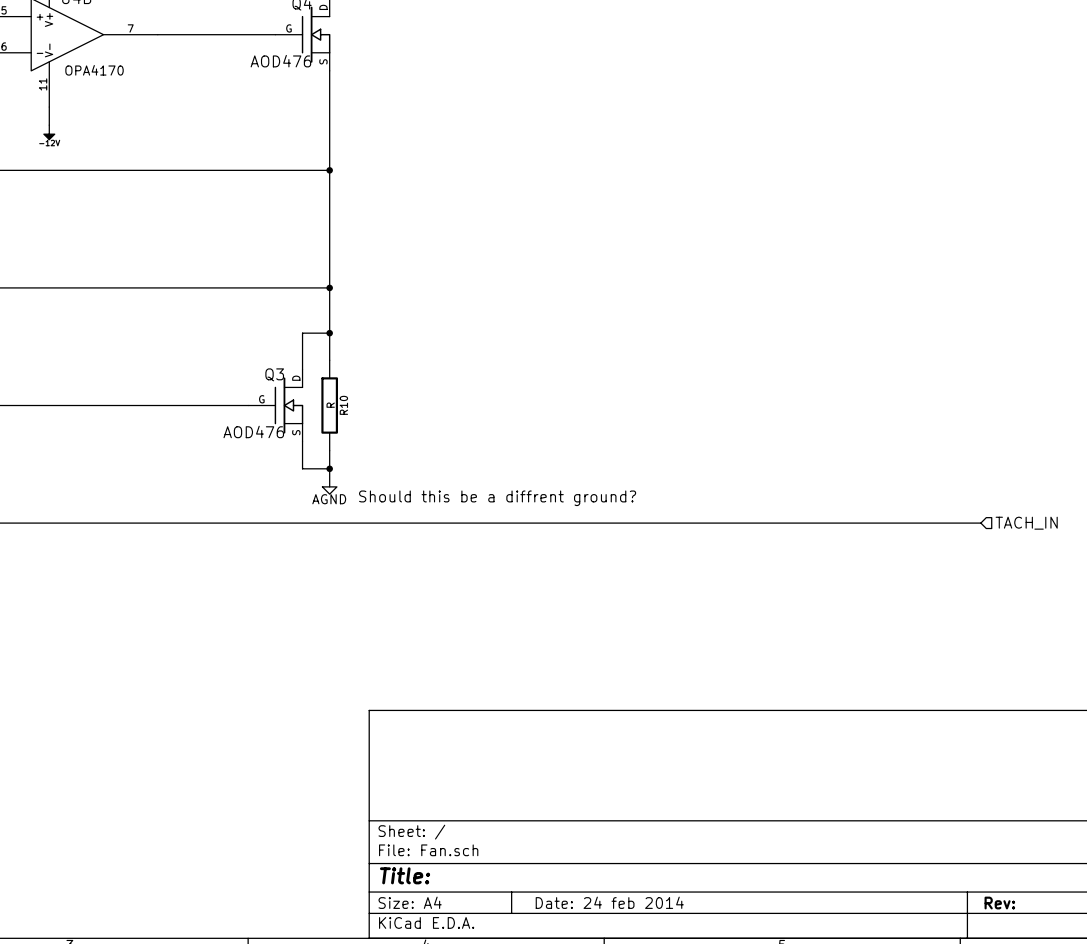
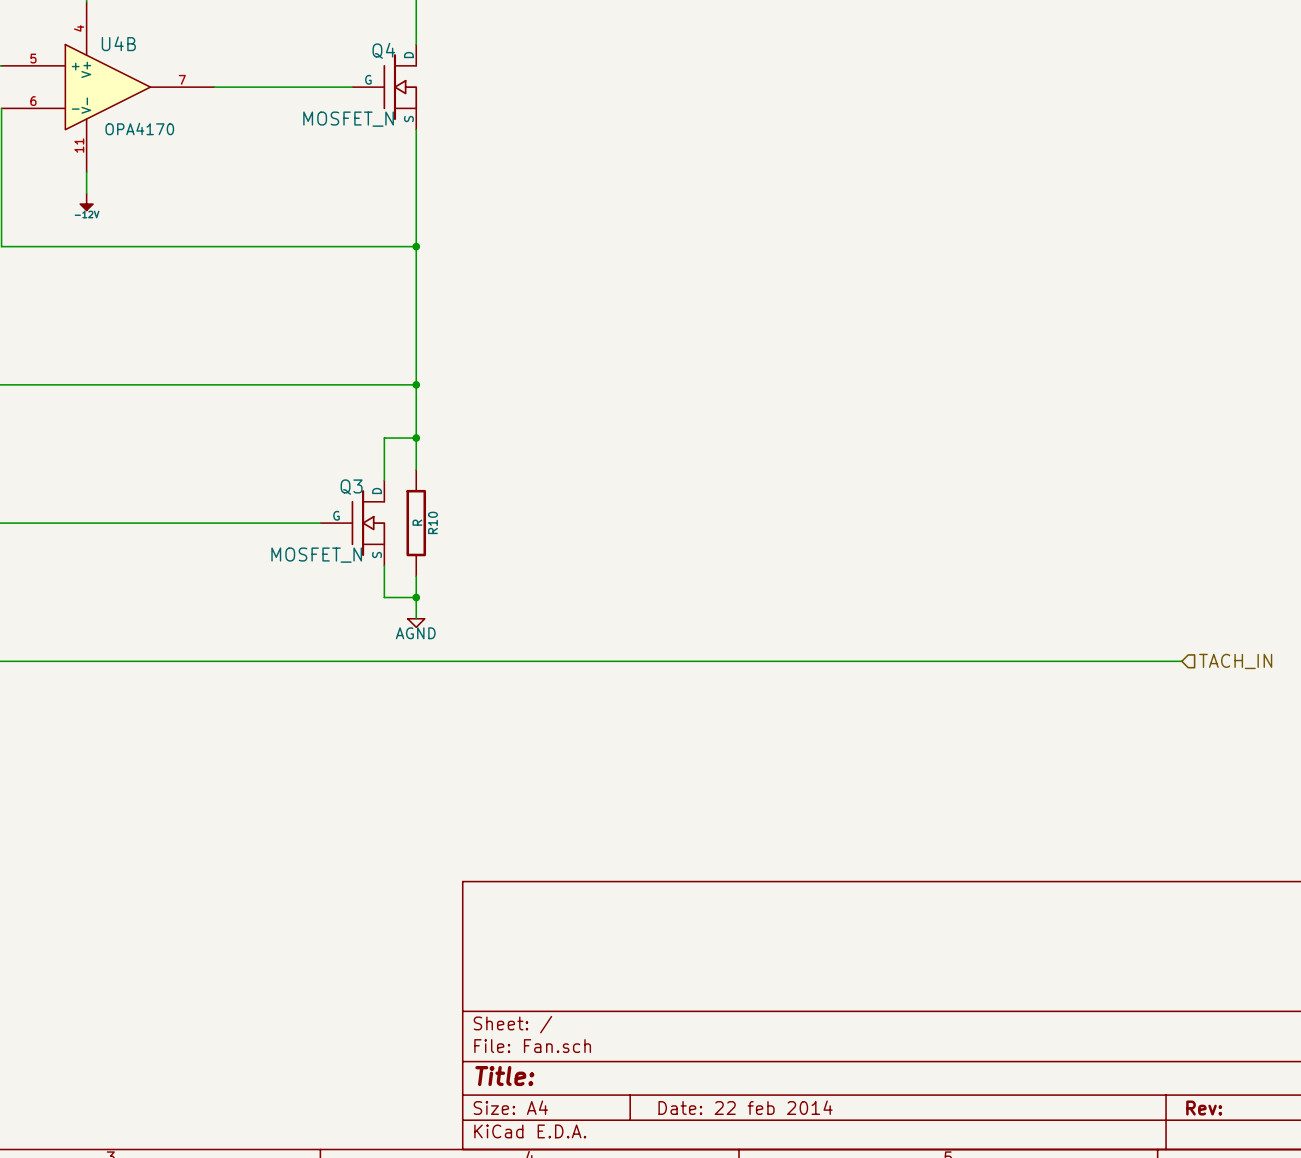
Q4 value: AOD476 (280, 61) -> MOSFET_N (348, 119)
Q3 value: AOD476 (253, 431) -> MOSFET_N (316, 555)
text: Should this be a diffrent ground? (497, 498) -> none
title block: Date: 24 feb 2014 (609, 902) -> Date: 22 feb 2014 (745, 1107)

